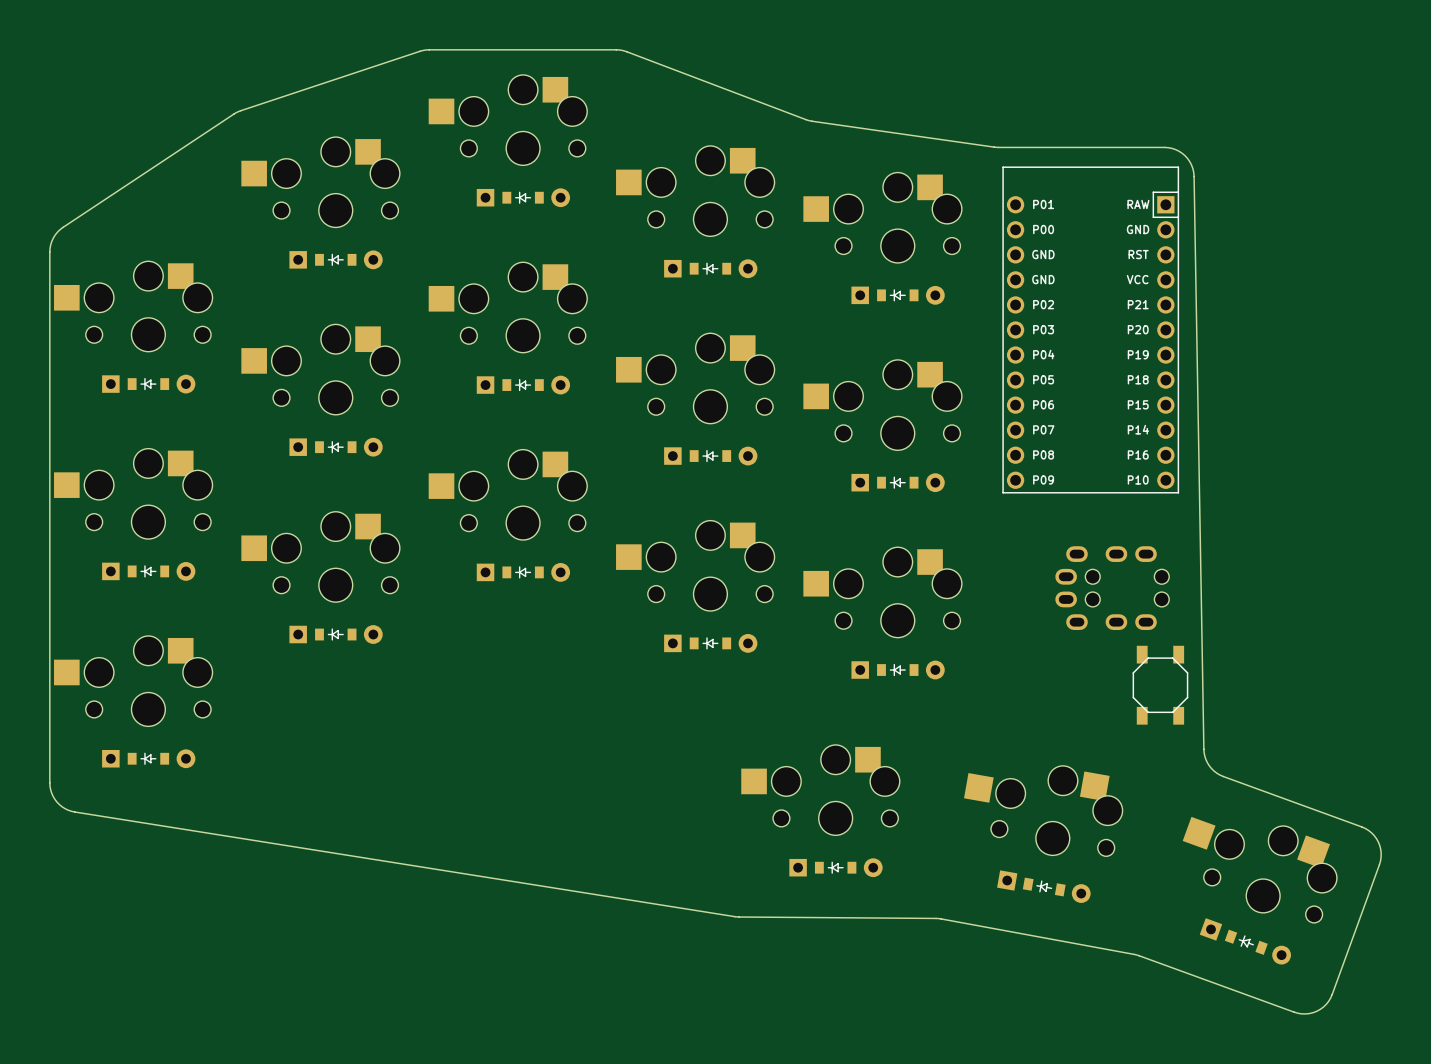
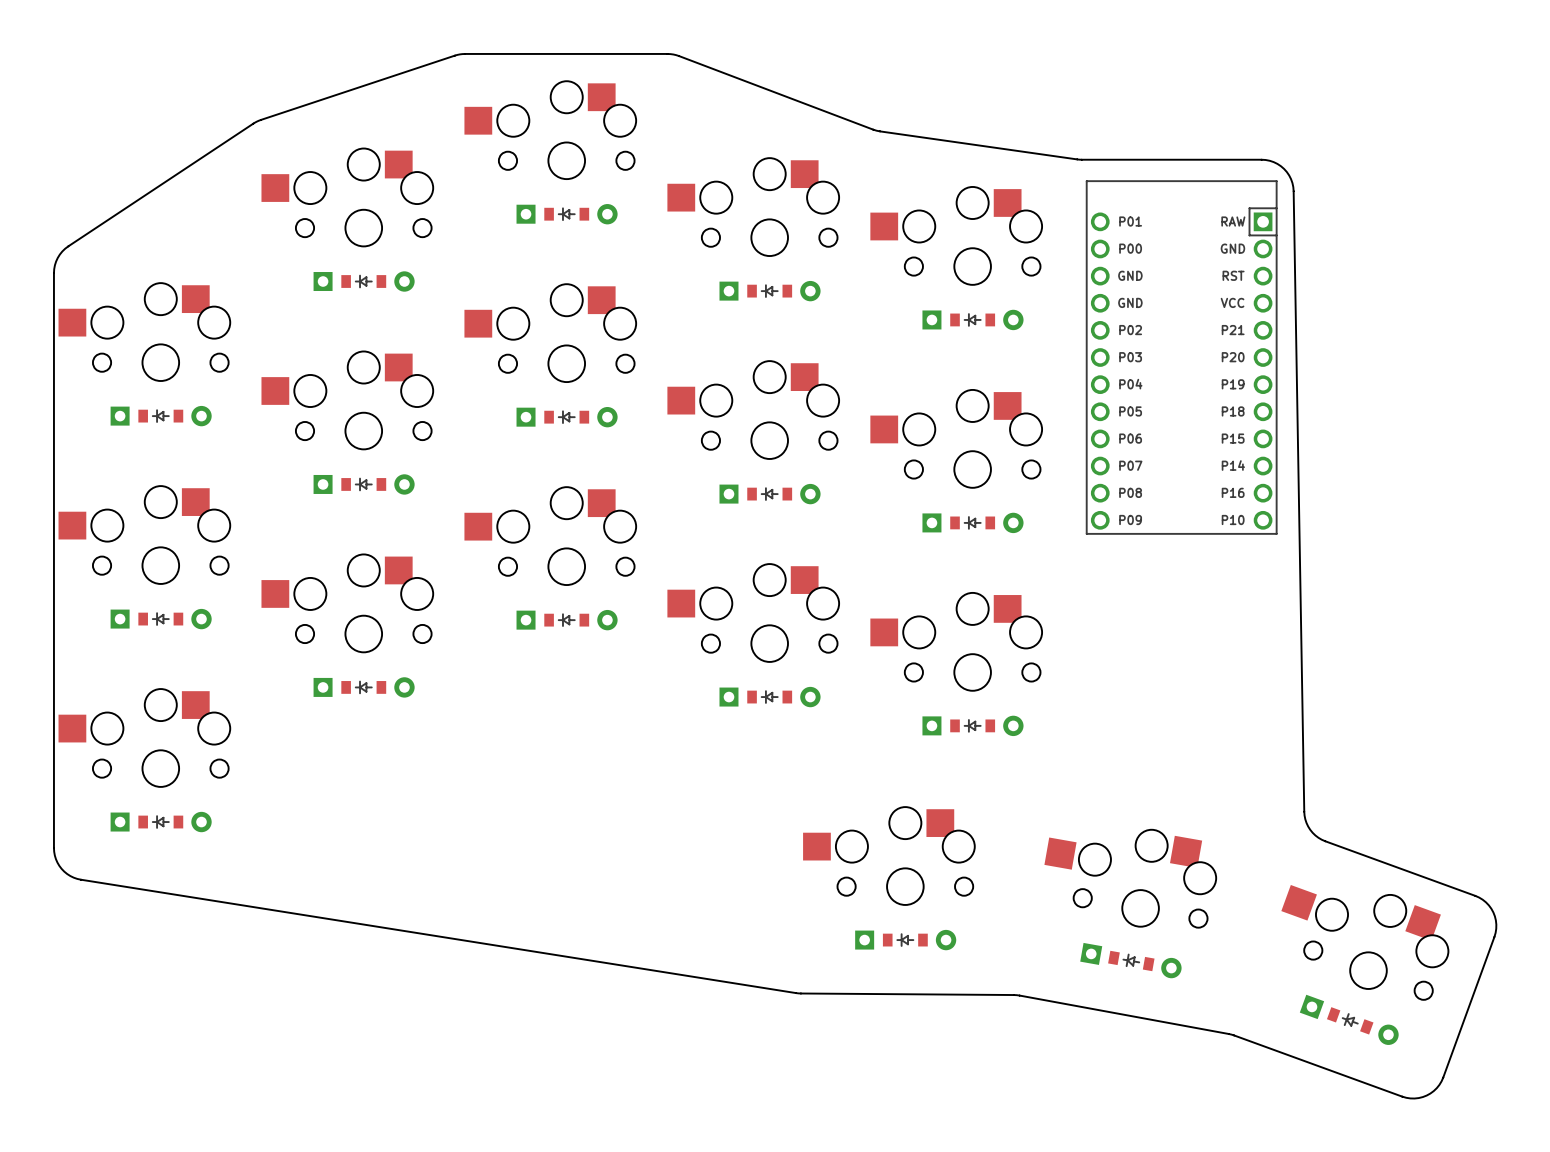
part: (1112, 588) -> none
part: (1160, 685) -> none

